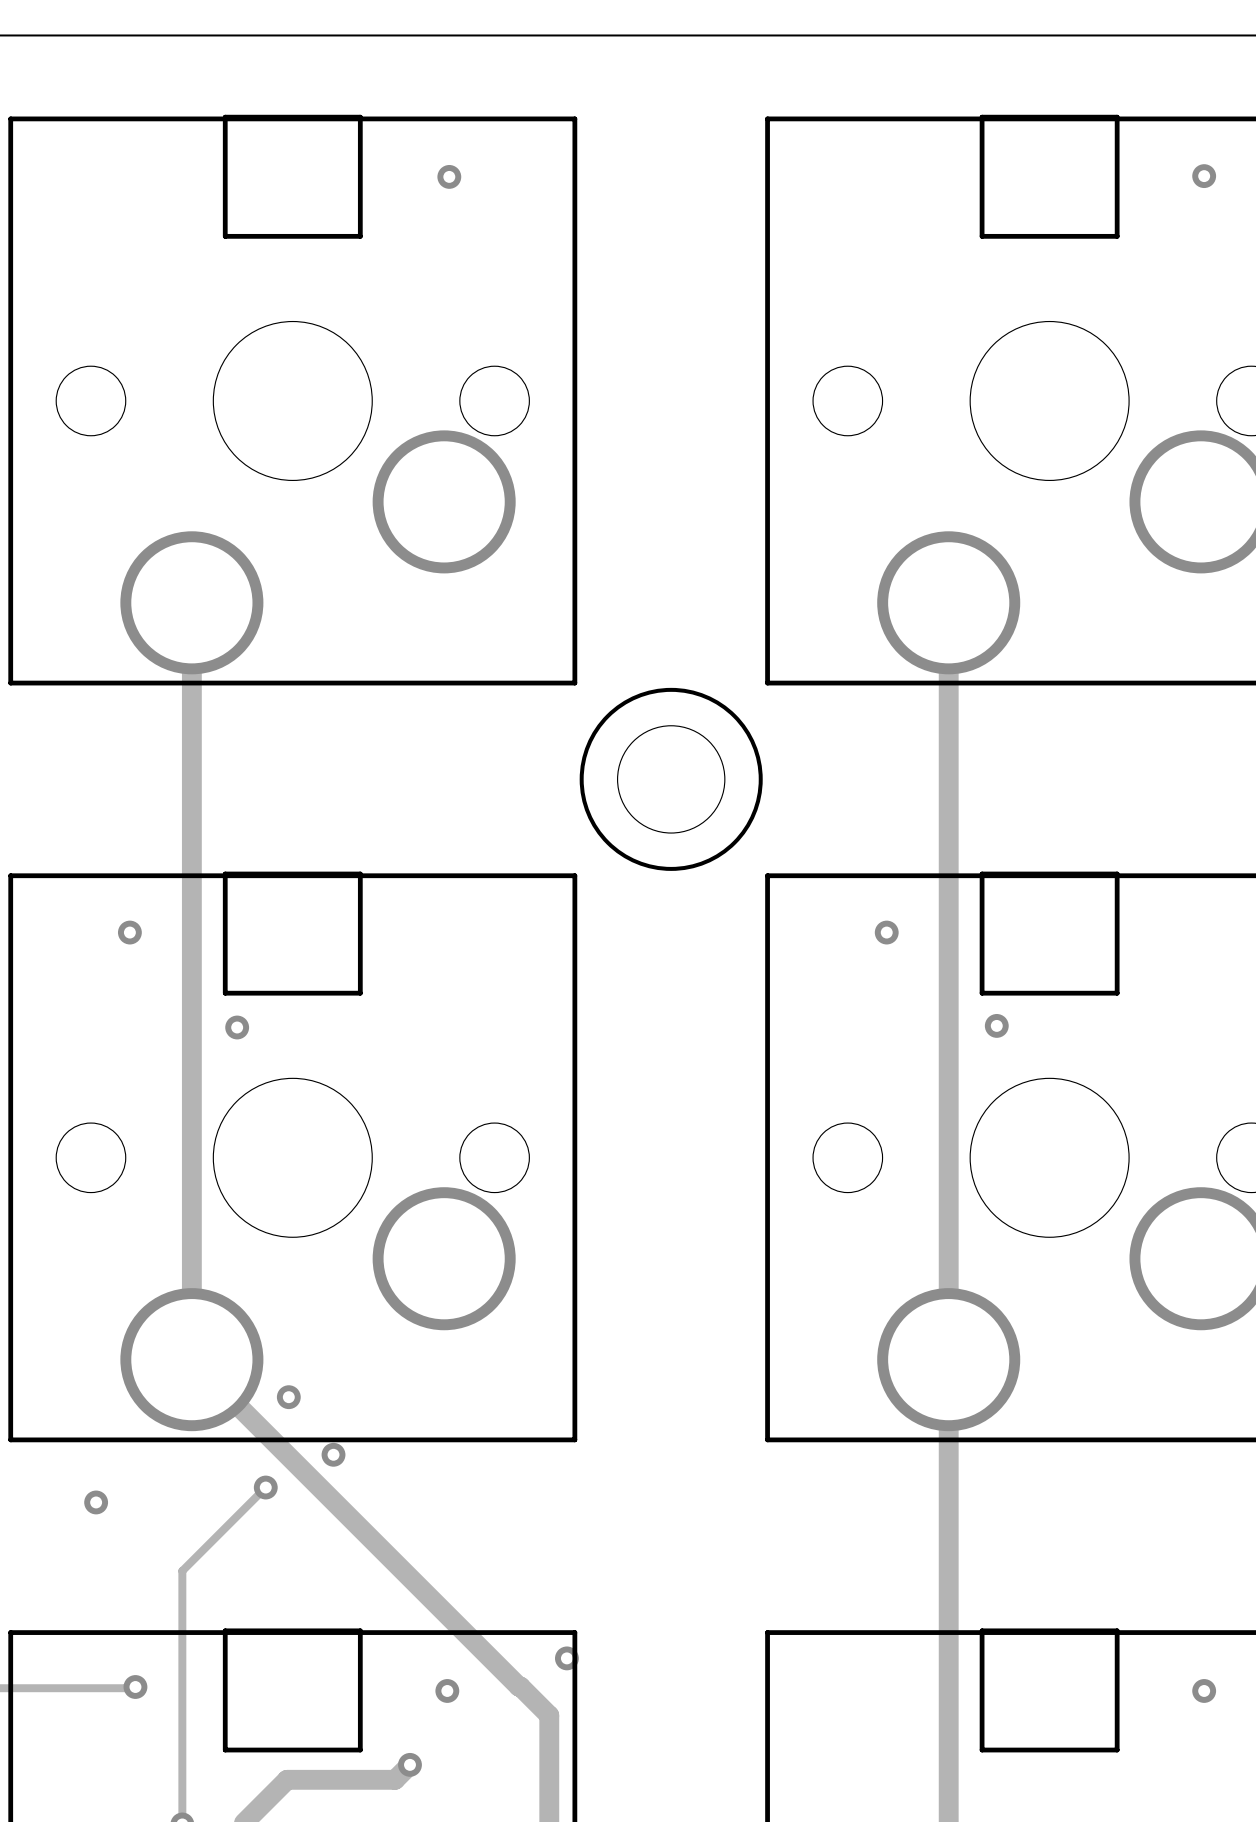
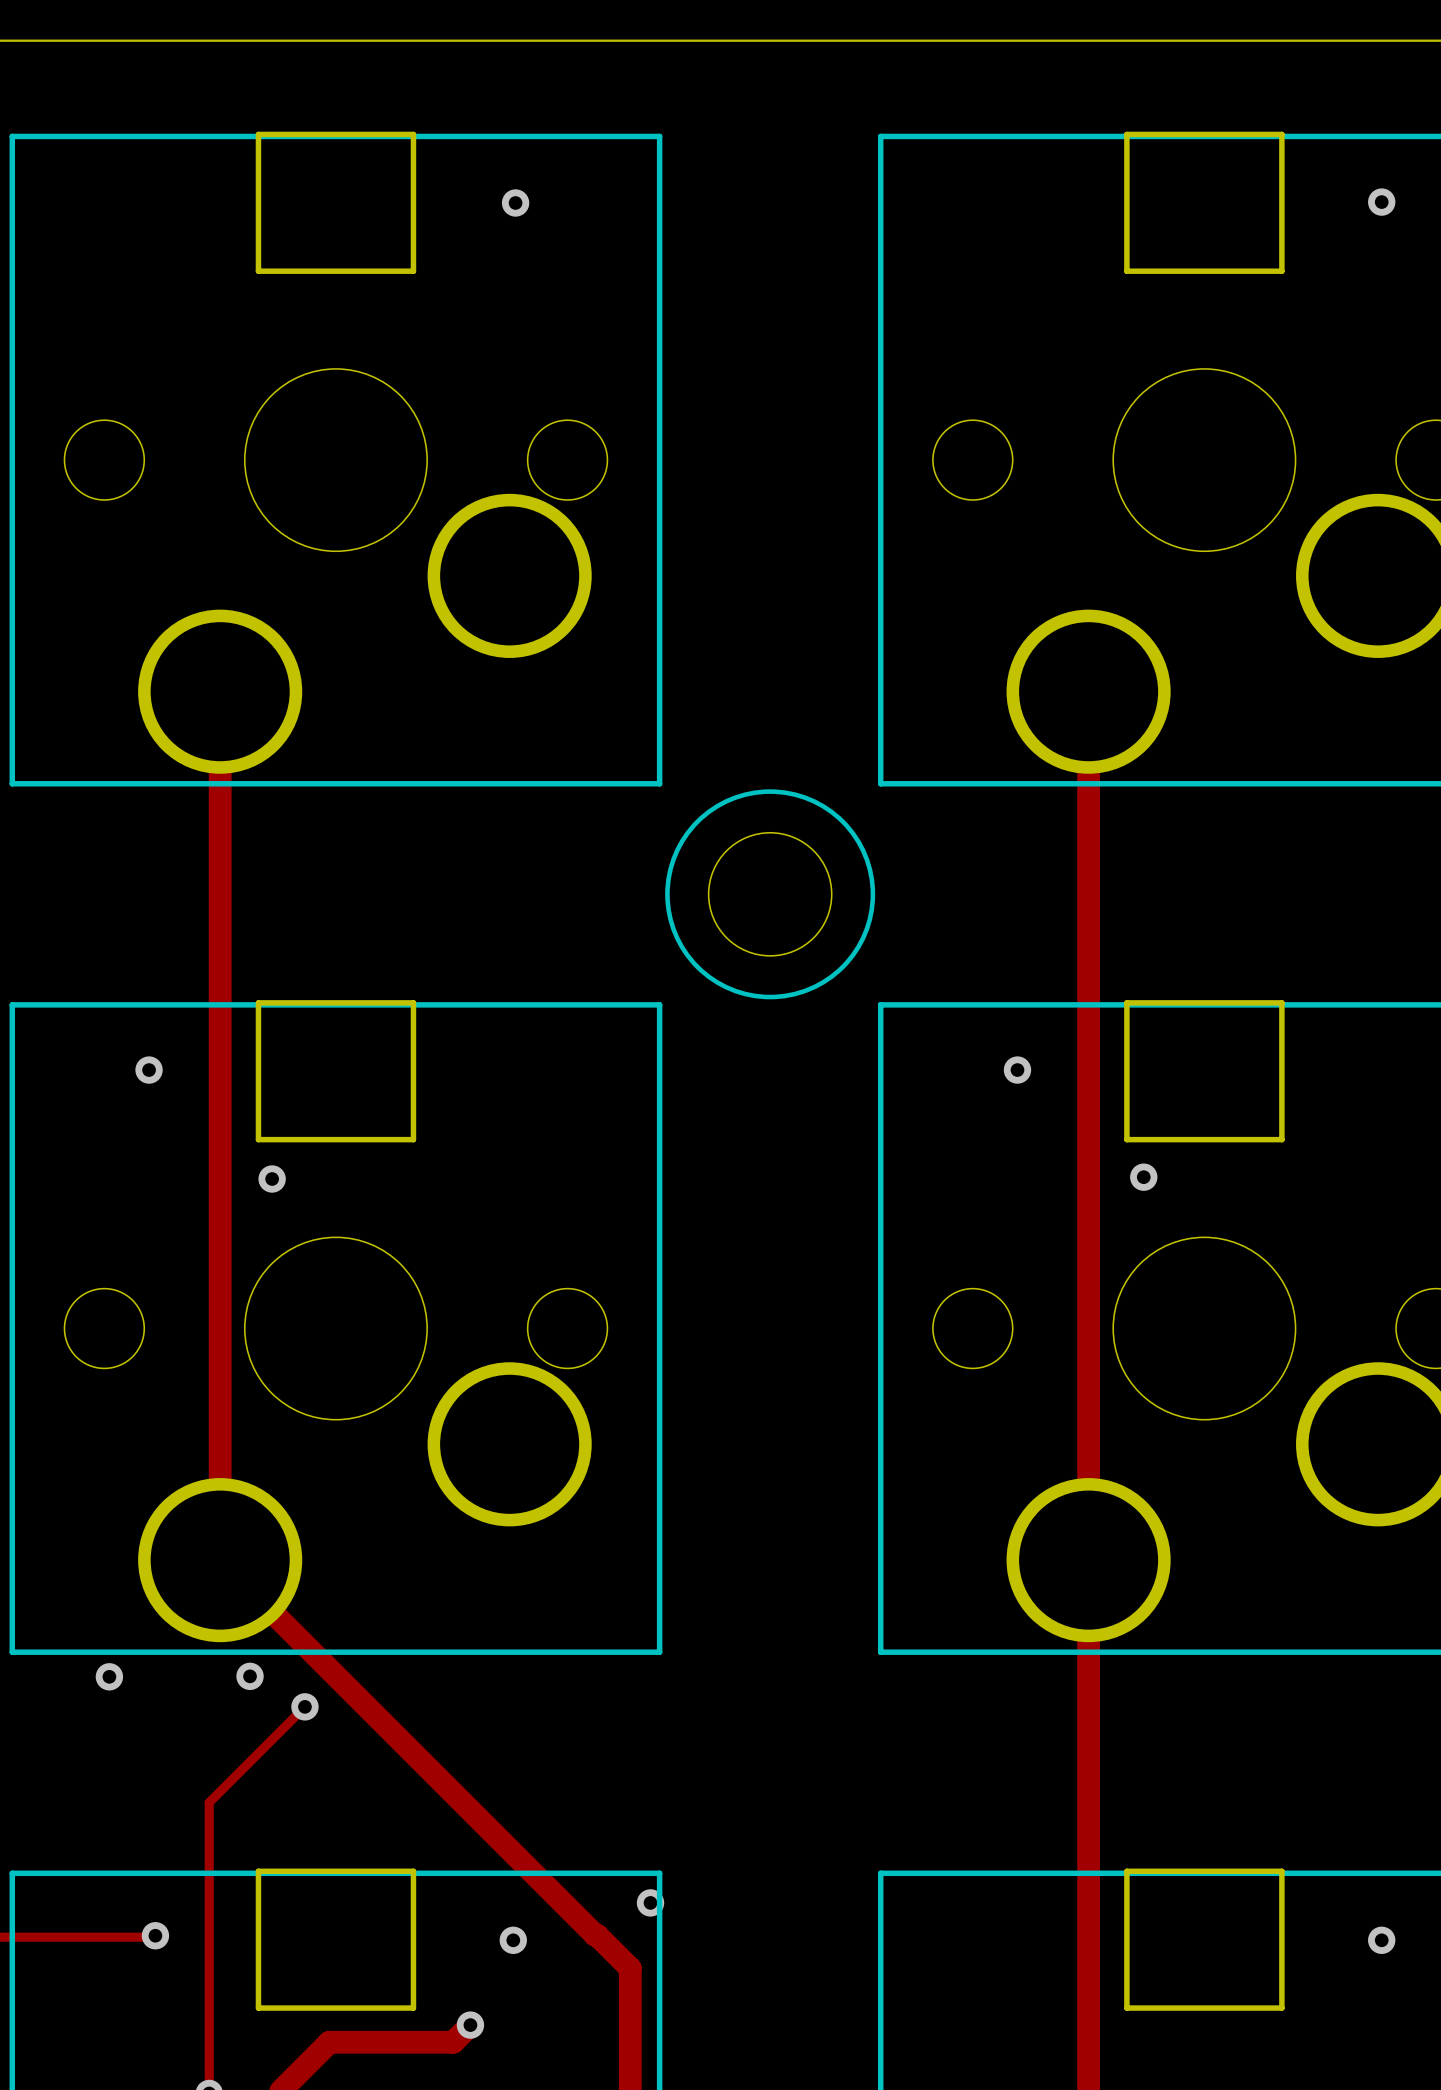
via: (288, 1397) -> none
via: (333, 1454) -> none
via: none -> (250, 1676)
via position: (96, 1502) -> (109, 1676)

